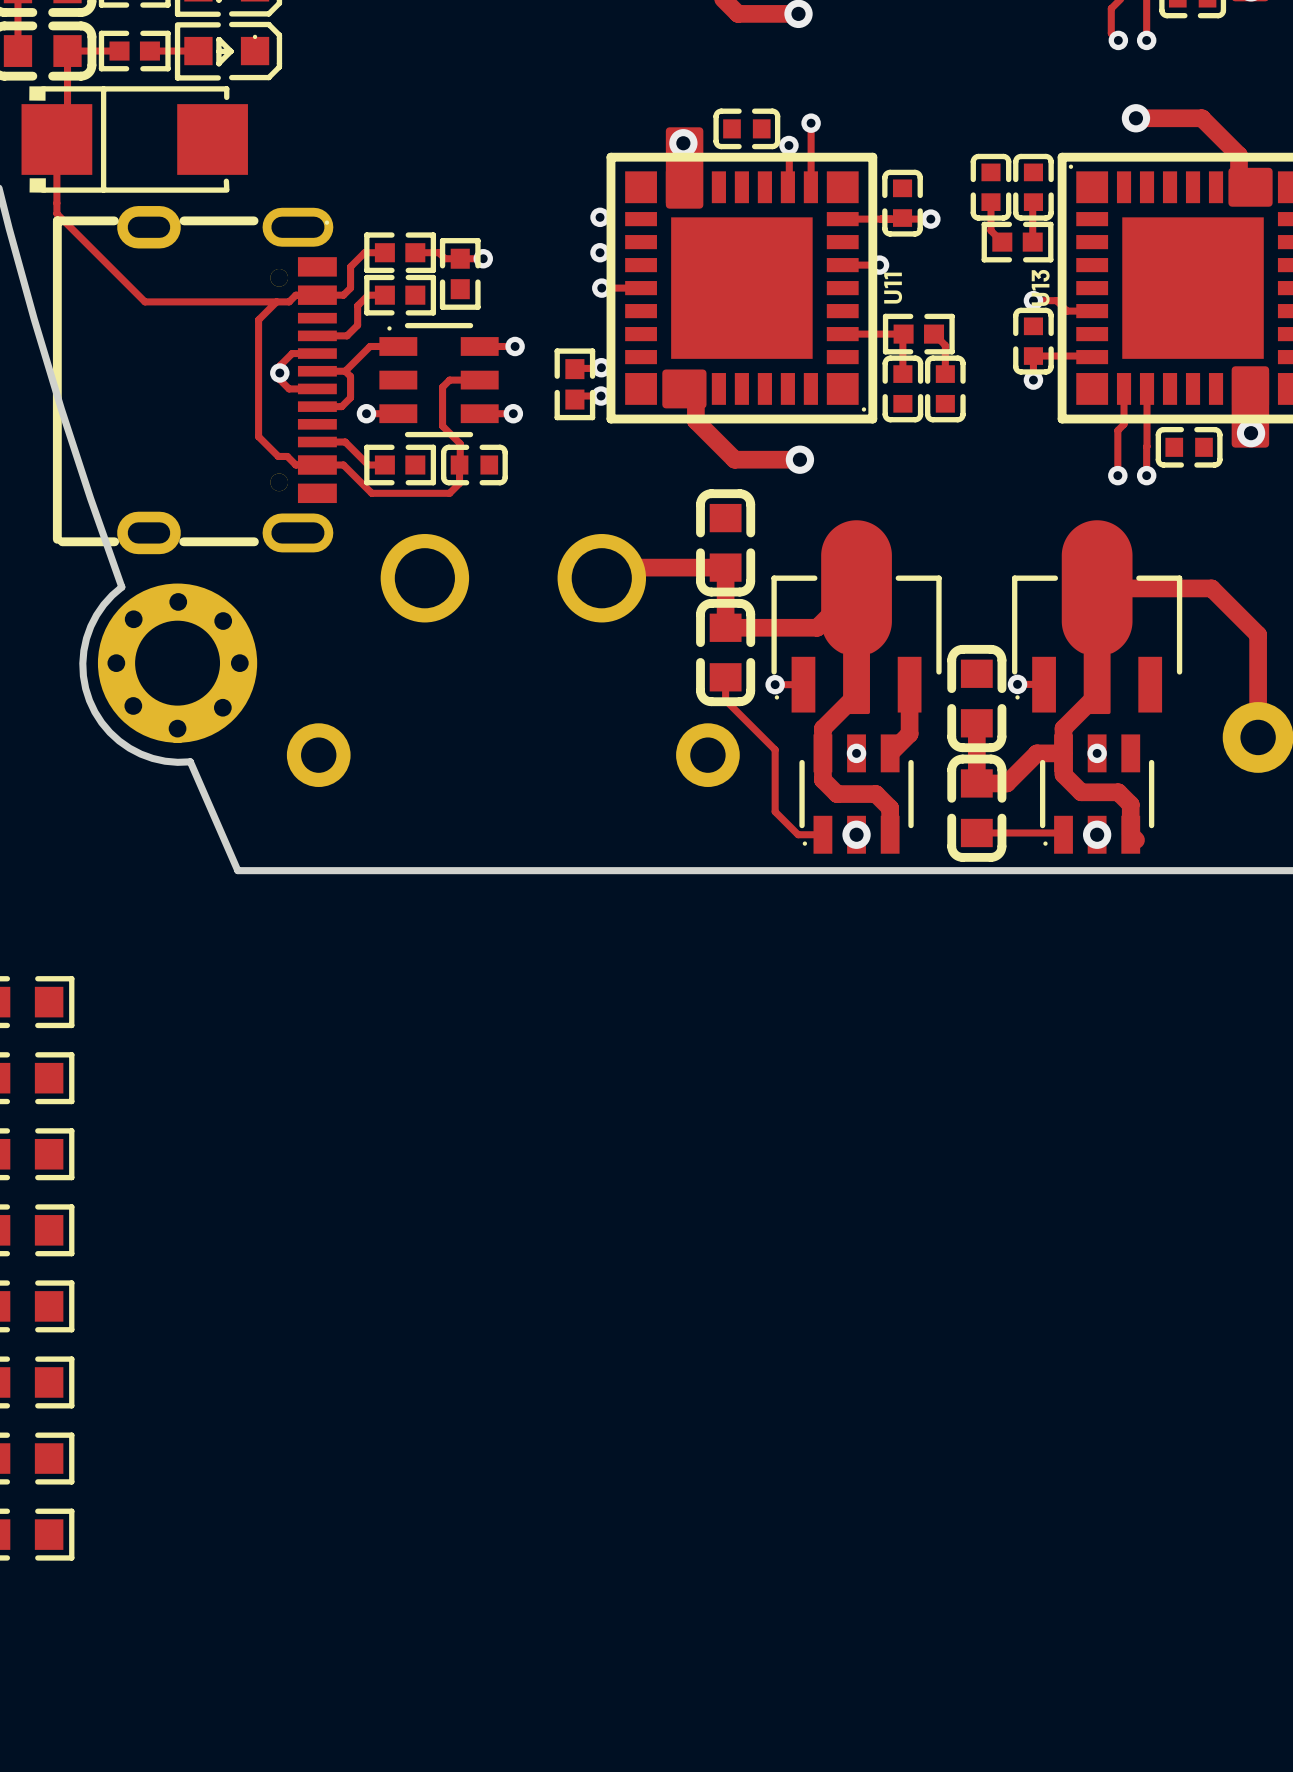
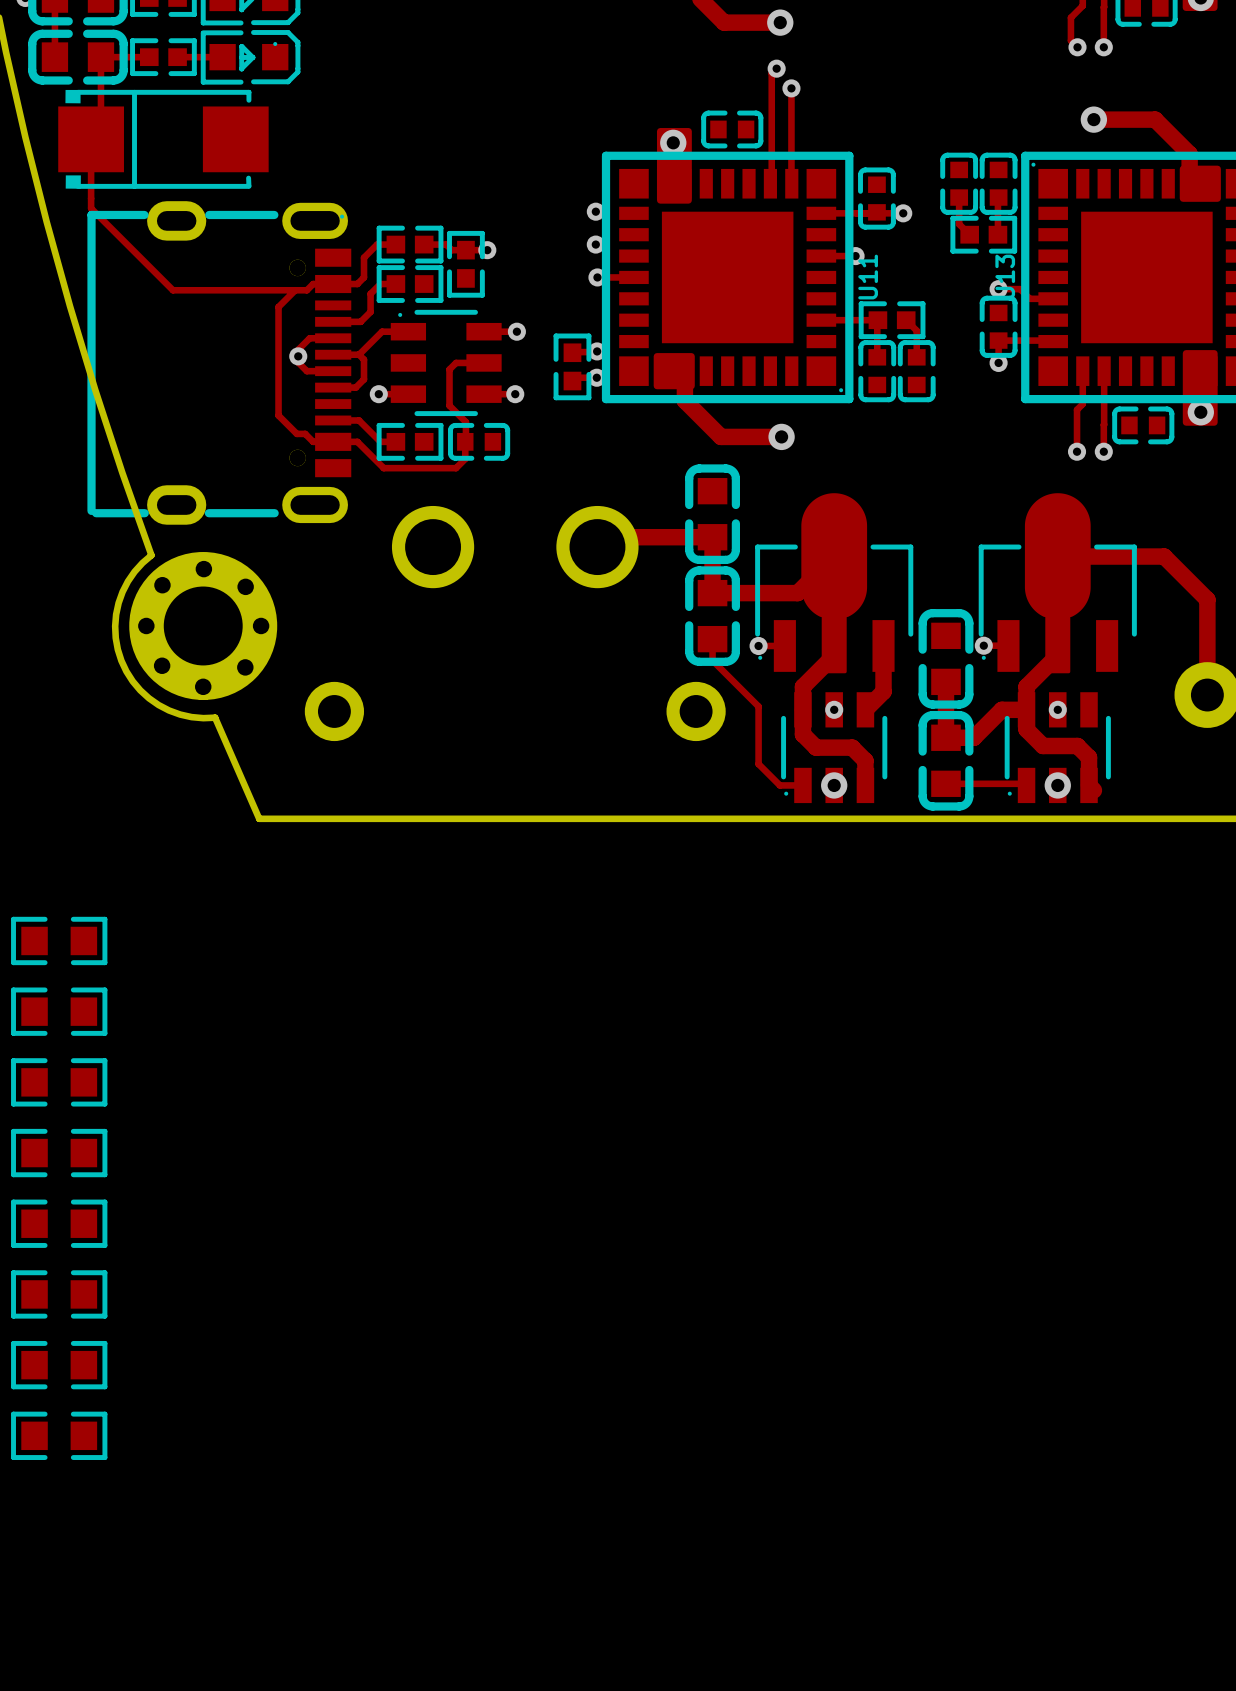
track: none -> (776, 68) (771, 73) (771, 145)
via: none -> (776, 68)
via: none -> (791, 88)
track: (811, 123) (811, 187) -> (791, 88) (791, 183)
via: (811, 123) -> none
via: (788, 145) -> none

